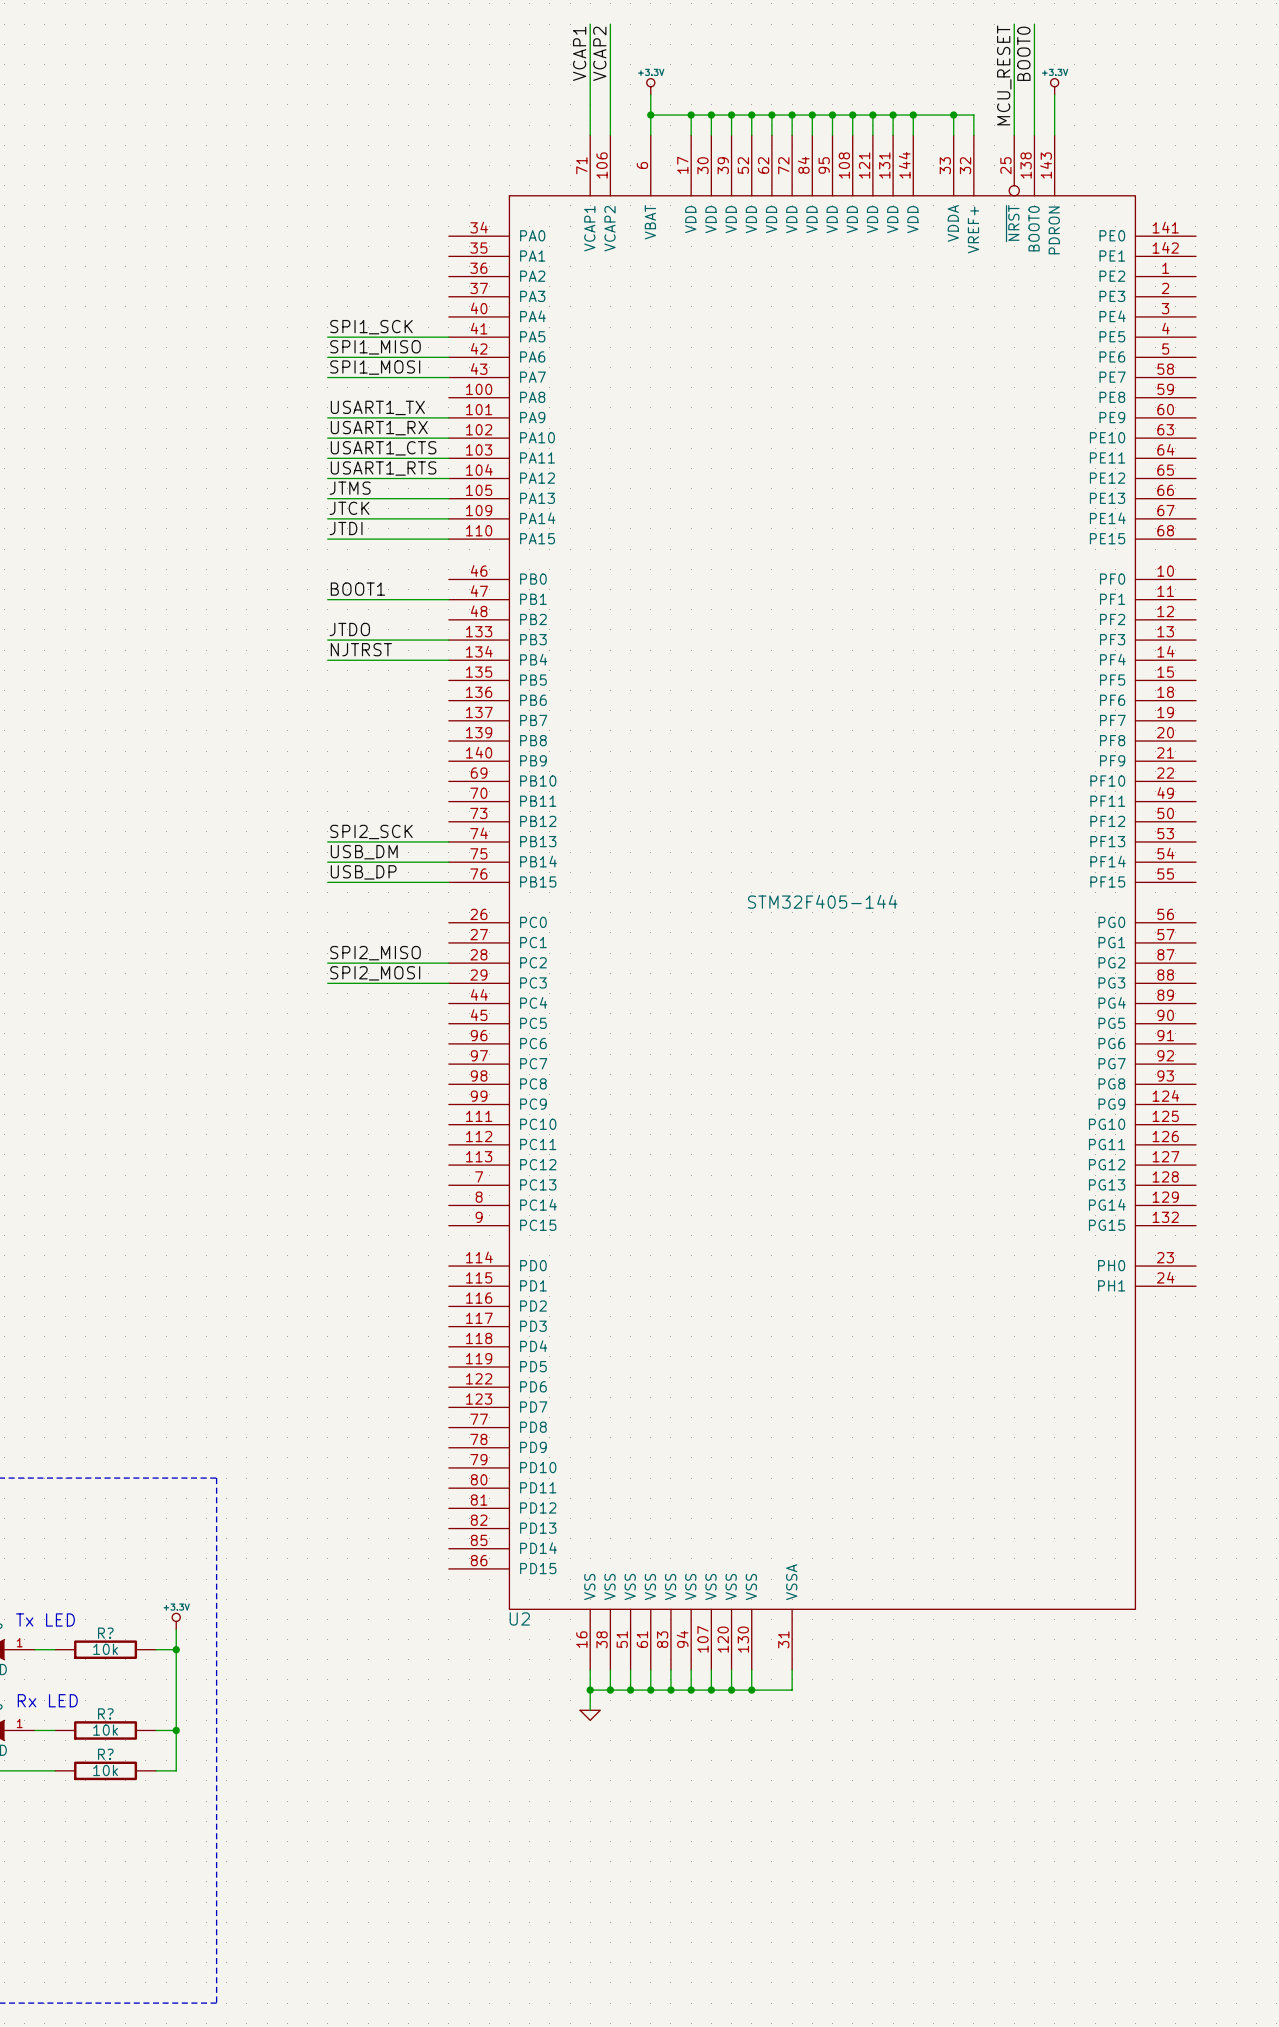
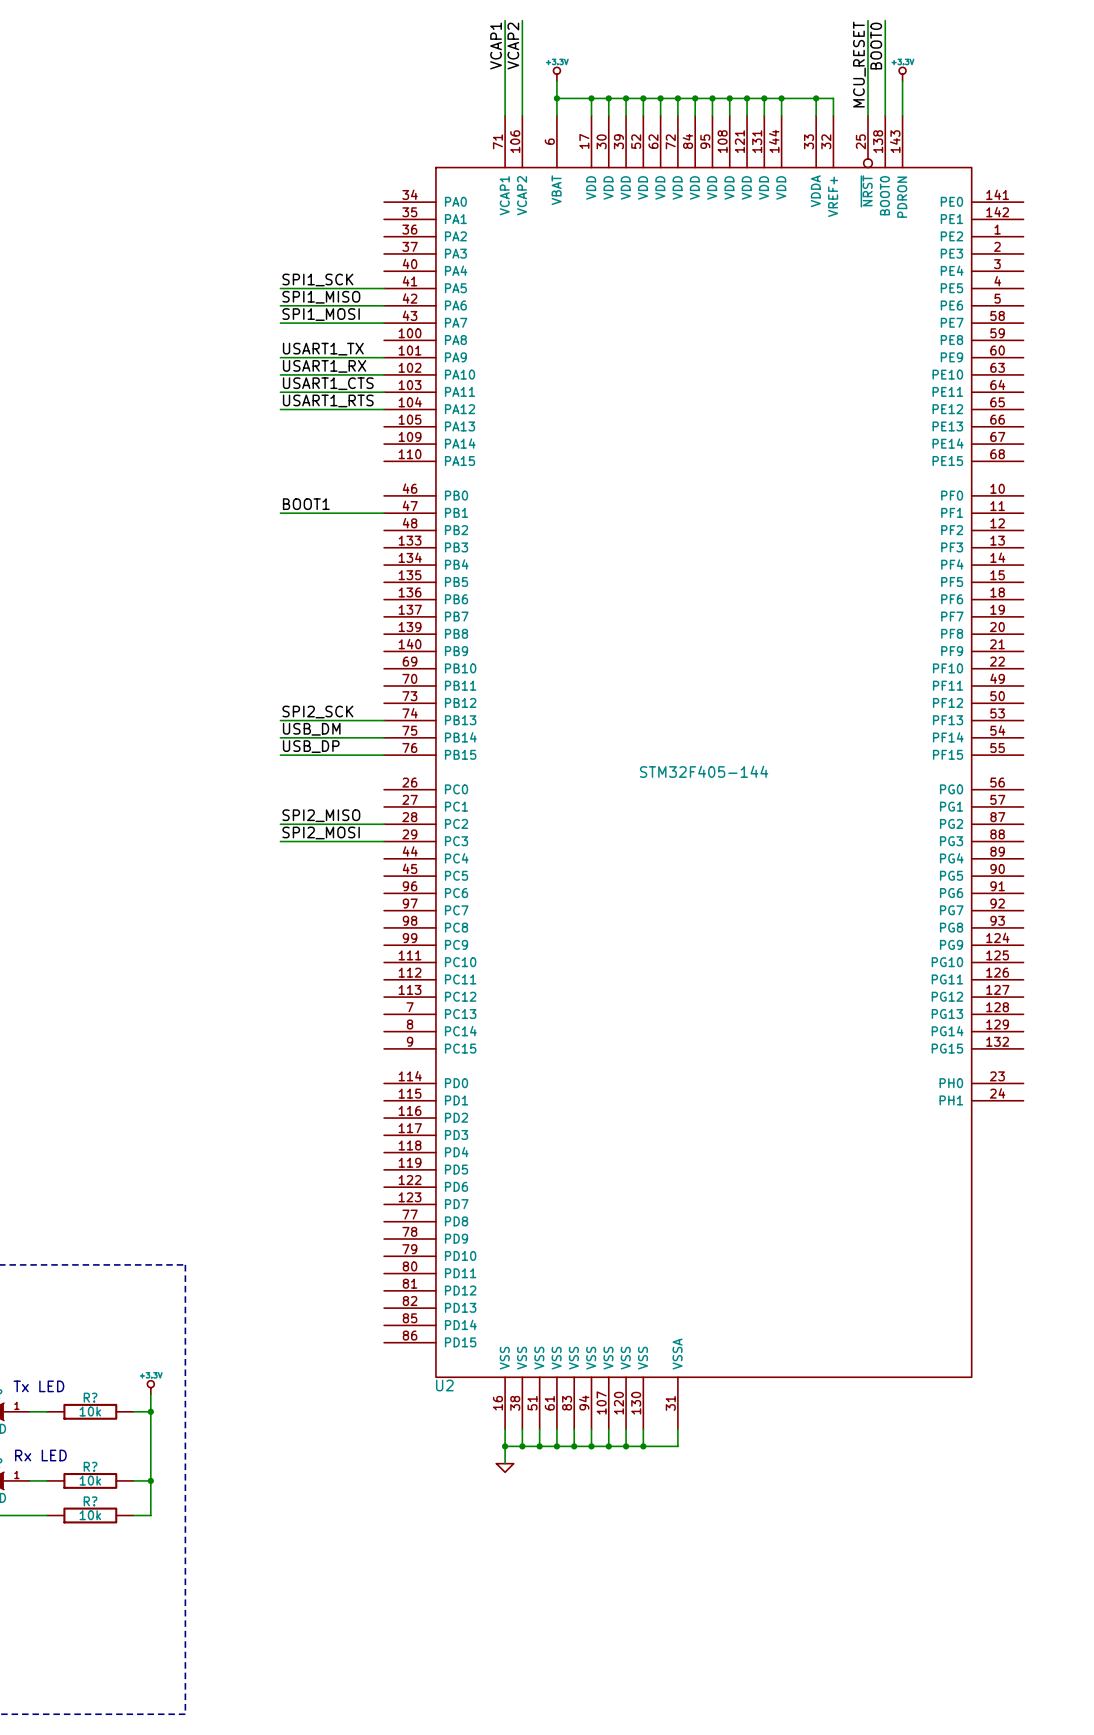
label: JTMS (350, 488) -> none
wire: (327, 498) (448, 498) -> none
label: JTCK (349, 508) -> none
wire: (327, 518) (448, 518) -> none
label: JTDI (346, 528) -> none
wire: (327, 539) (448, 539) -> none
label: JTDO (349, 629) -> none
wire: (327, 640) (448, 640) -> none
label: NJTRST (361, 649) -> none
wire: (327, 660) (448, 660) -> none

